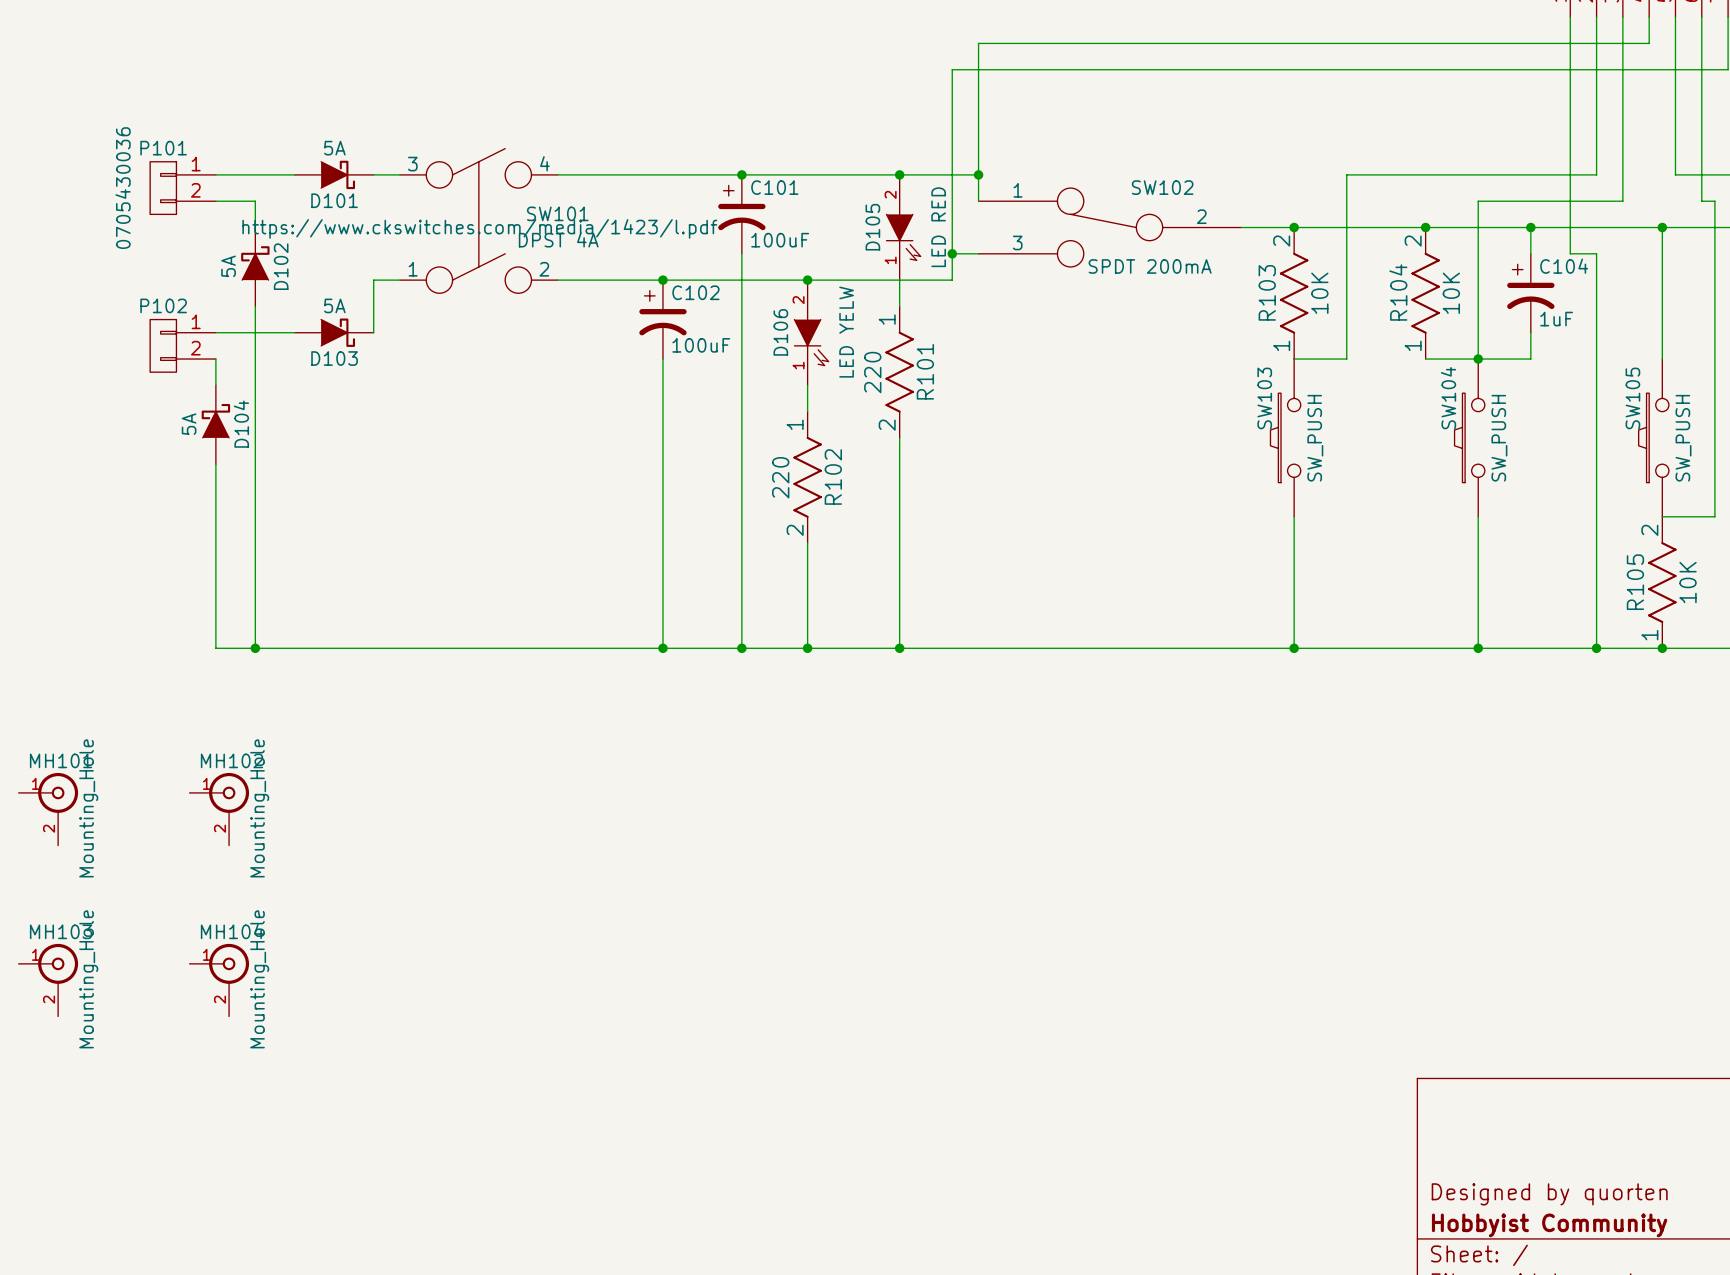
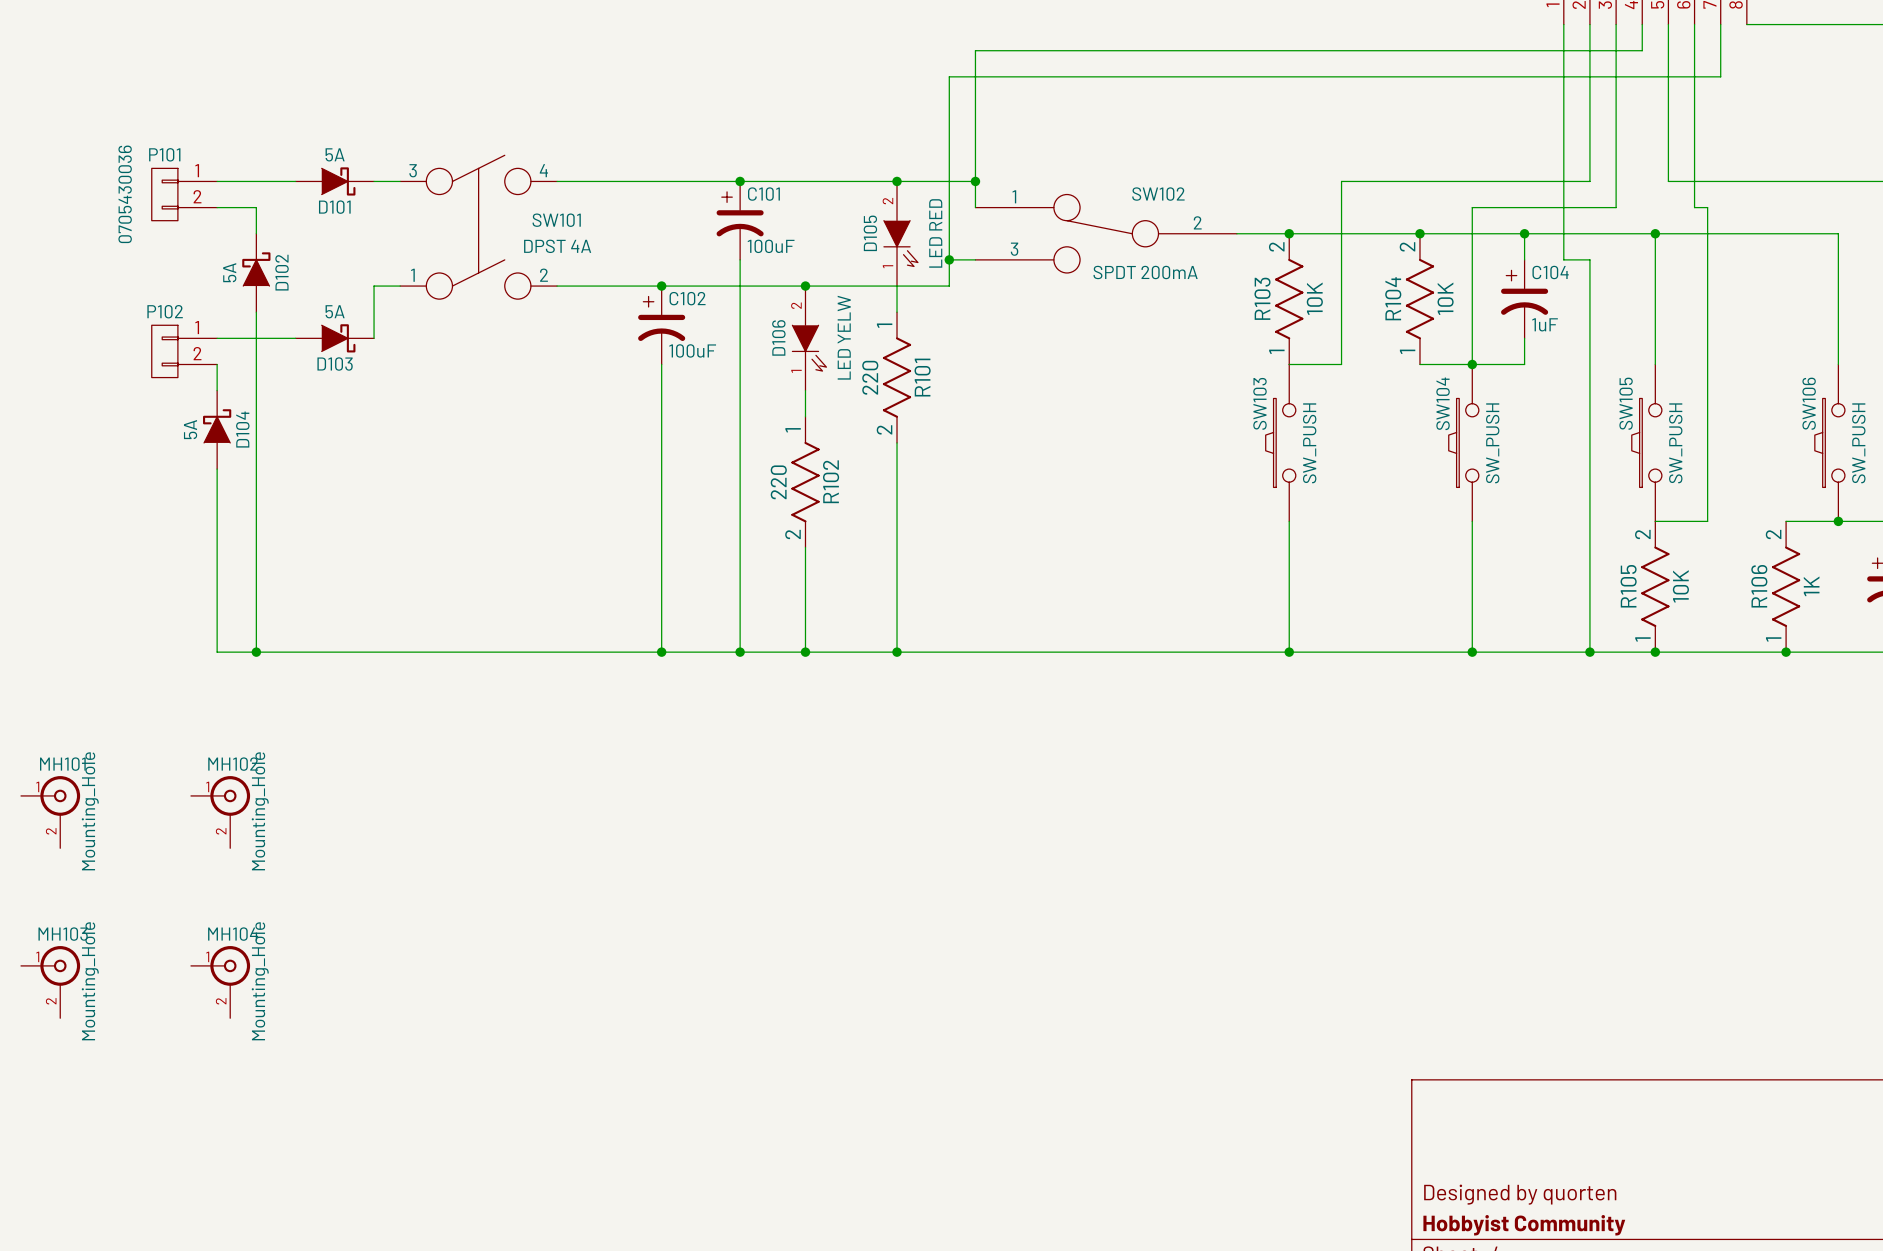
SW101 text: https://www.ckswitches.com/media/1423/l.pdf (479, 228) -> none

